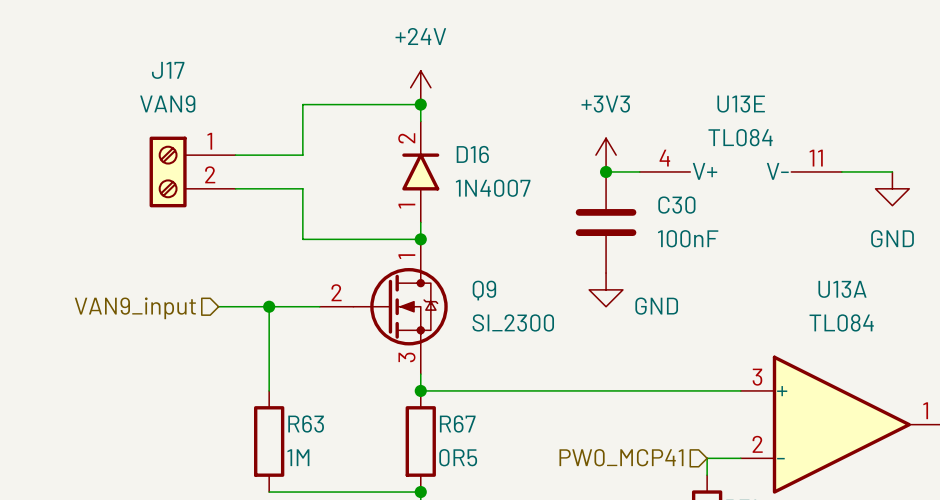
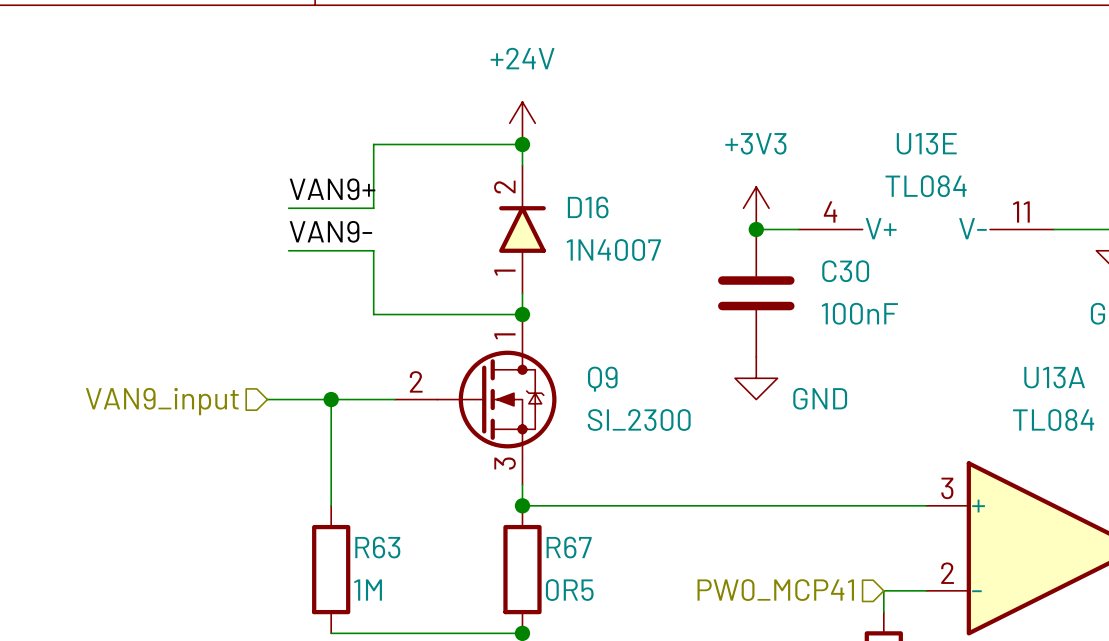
label: none -> VAN9+ (332, 189)
J17: VAN9 (192, 171) -> none
label: none -> VAN9- (330, 231)

